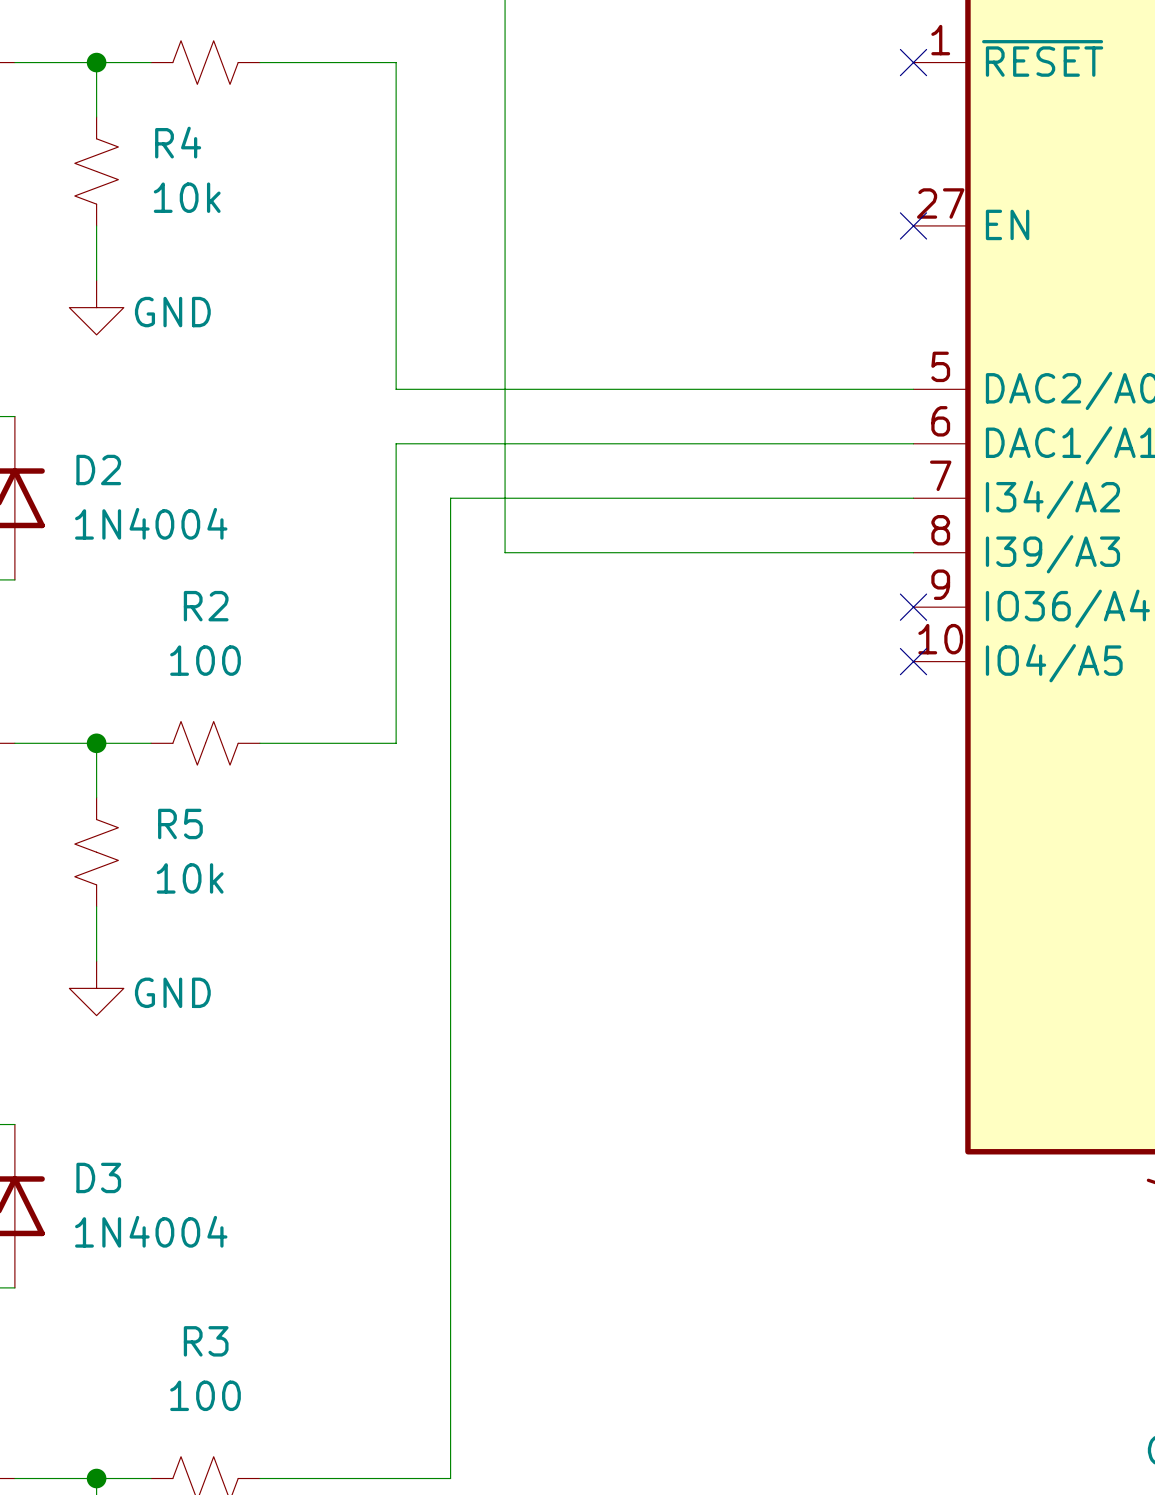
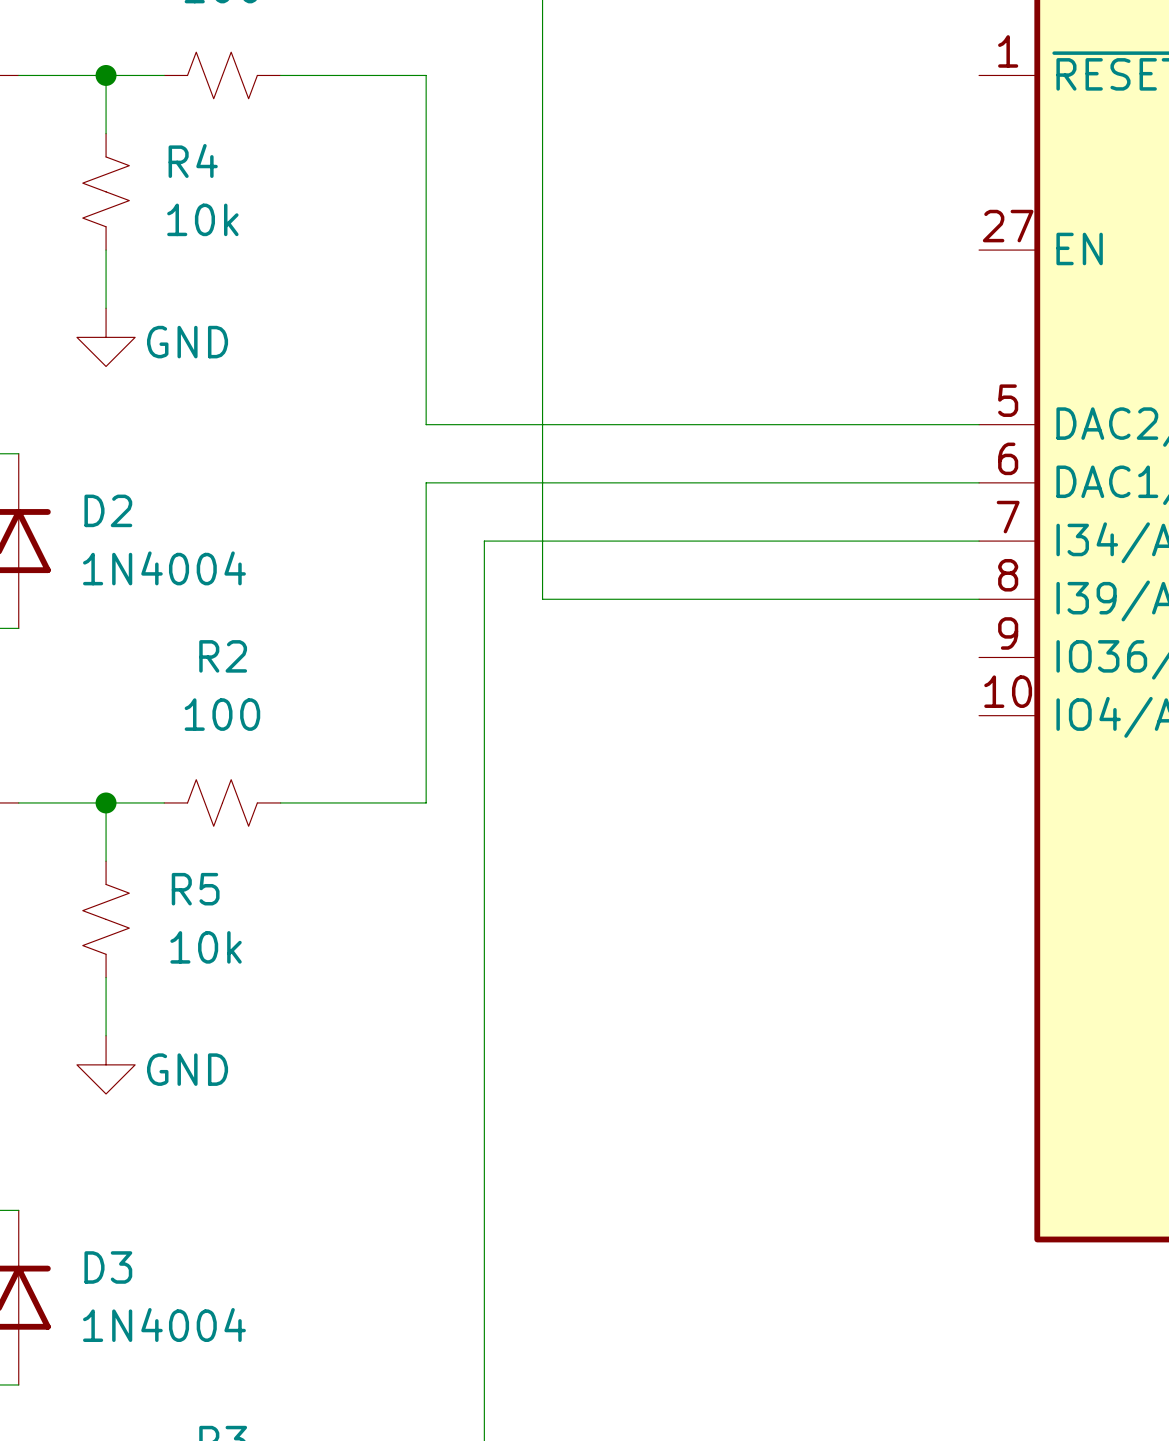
no-connect mark: (913, 62) -> none
no-connect mark: (913, 225) -> none
no-connect mark: (913, 607) -> none
no-connect mark: (913, 661) -> none

